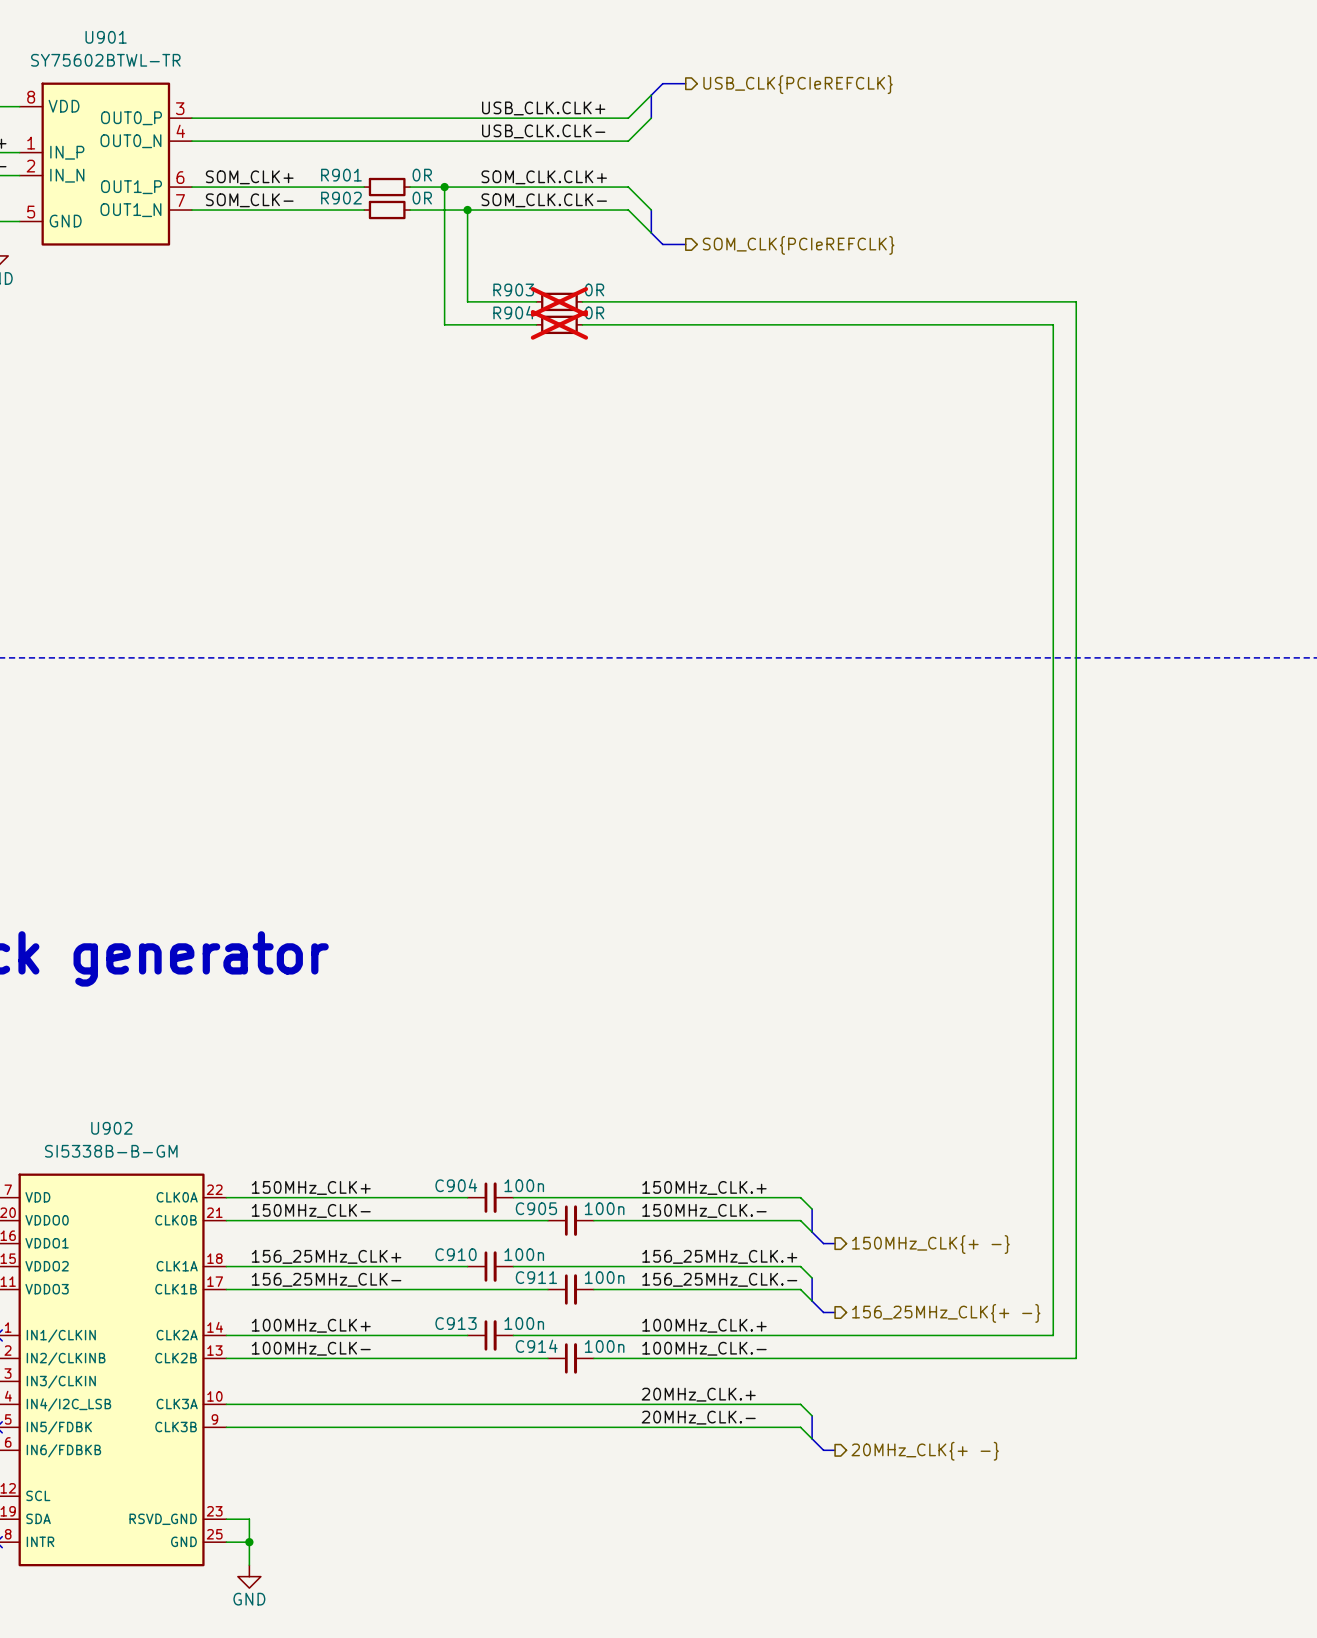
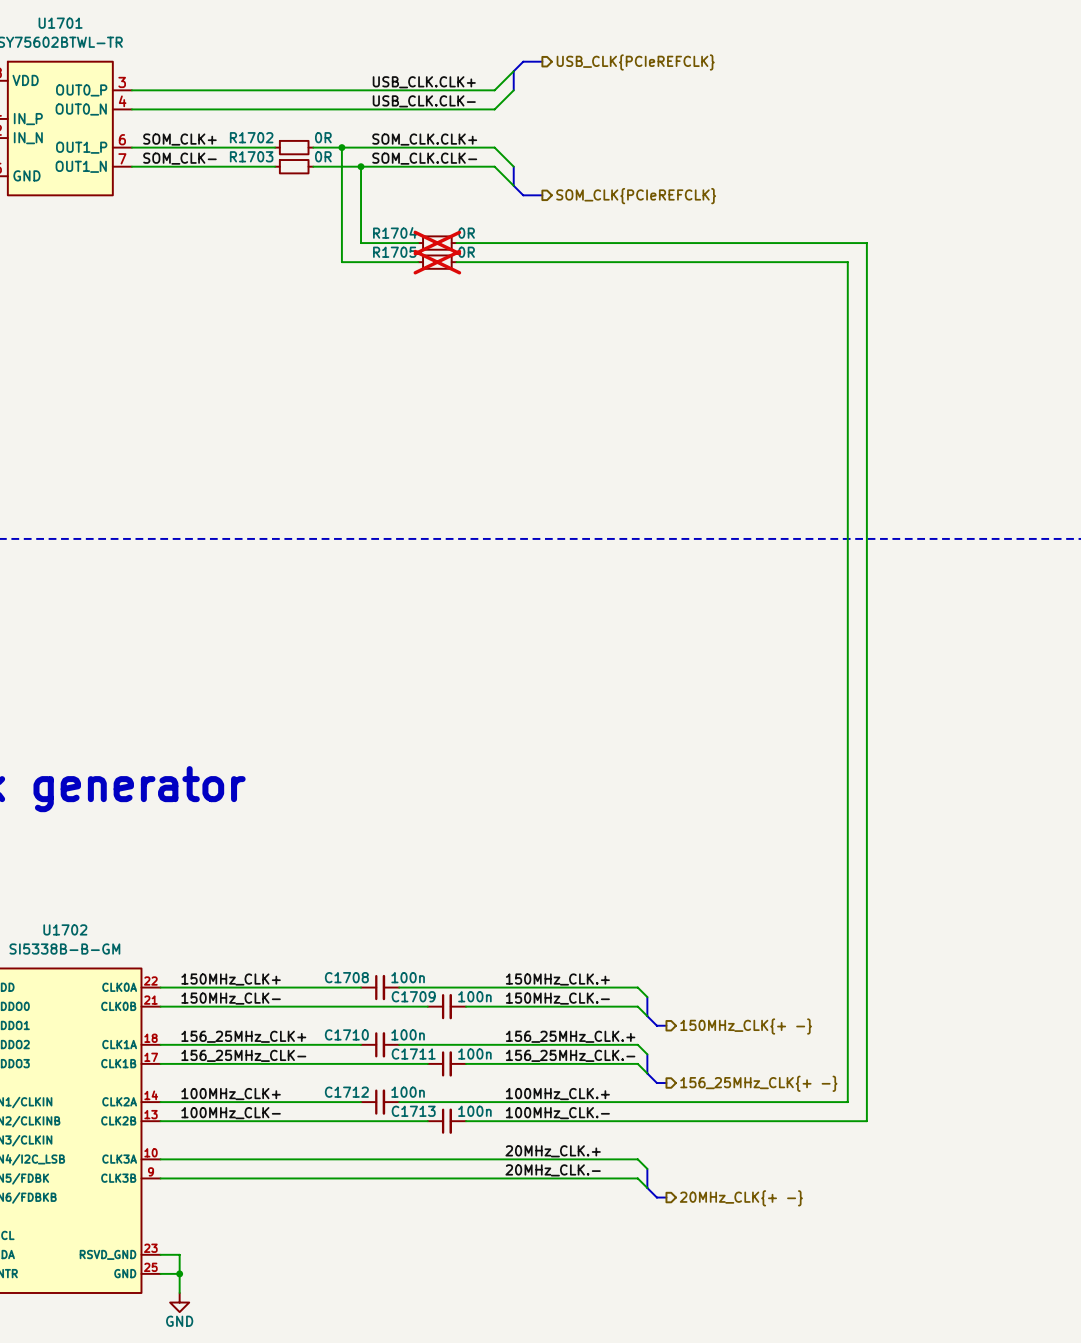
U901 name: U901 (106, 37) -> U1701 (60, 23)
R901 name: R901 (341, 175) -> R1702 (251, 137)
R902 name: R902 (341, 198) -> R1703 (251, 156)
R903 name: R903 (513, 289) -> R1704 (395, 232)
R904 name: R904 (513, 312) -> R1705 (394, 252)
U902 name: U902 (111, 1128) -> U1702 (65, 929)
C904 name: C904 (456, 1185) -> C1708 (346, 977)
C905 name: C905 (536, 1208) -> C1709 (413, 996)
C910 name: C910 (456, 1254) -> C1710 (346, 1034)
C911 name: C911 (536, 1277) -> C1711 (413, 1054)
C913 name: C913 (456, 1323) -> C1712 (346, 1092)
C914 name: C914 (536, 1346) -> C1713 (413, 1111)

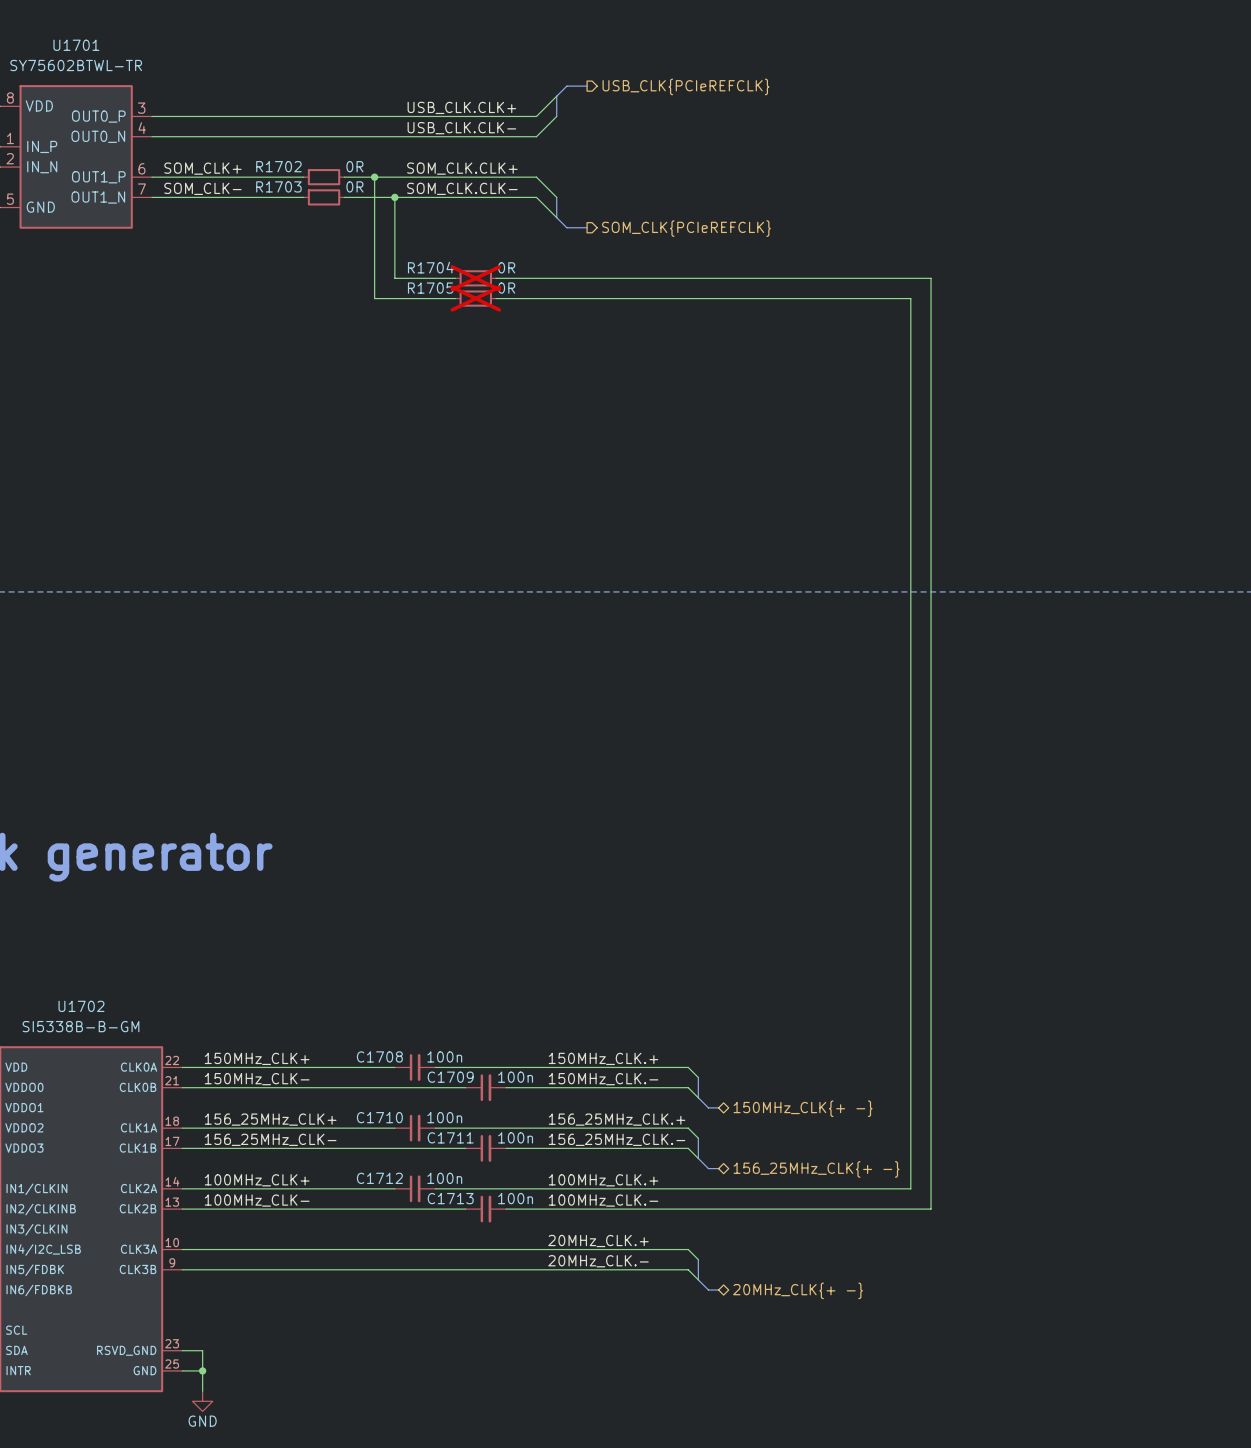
hierarchical label shape: output (746, 1026) -> bidirectional (803, 1108)
hierarchical label shape: output (758, 1083) -> bidirectional (816, 1169)
hierarchical label shape: output (741, 1198) -> bidirectional (797, 1290)

